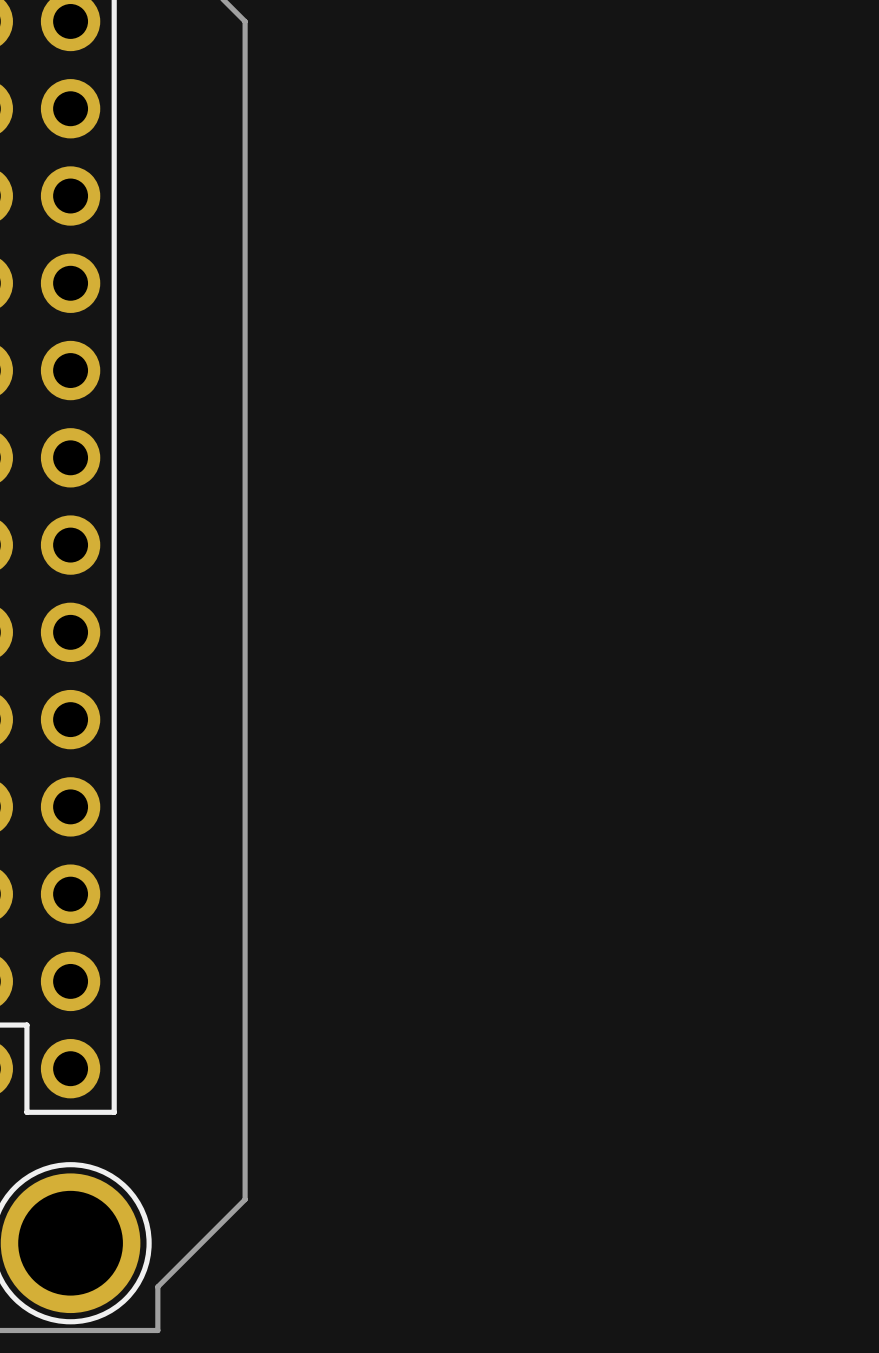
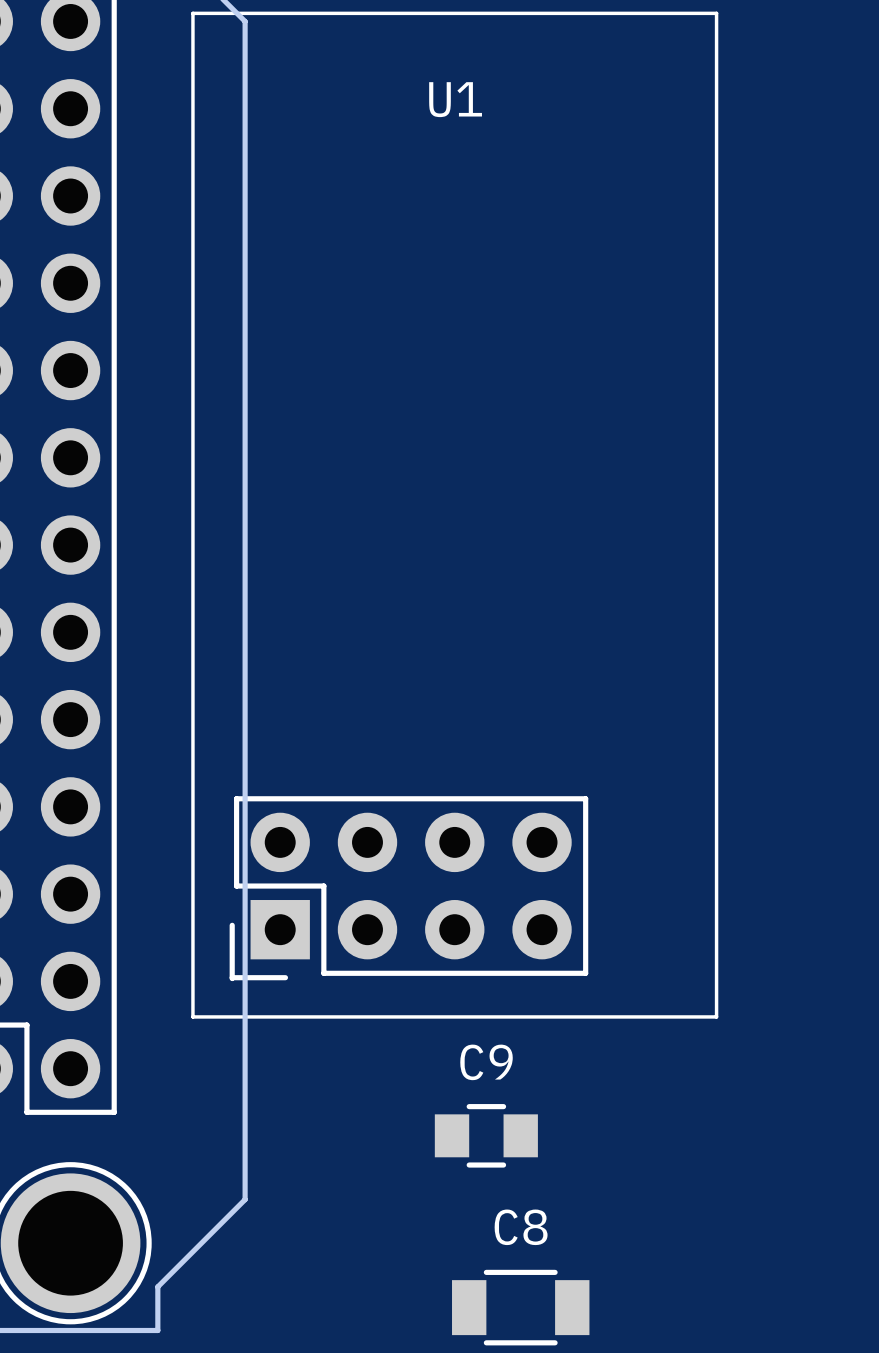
U1: none -> (454, 515)
C9: none -> (486, 1135)
C8: none -> (520, 1307)

